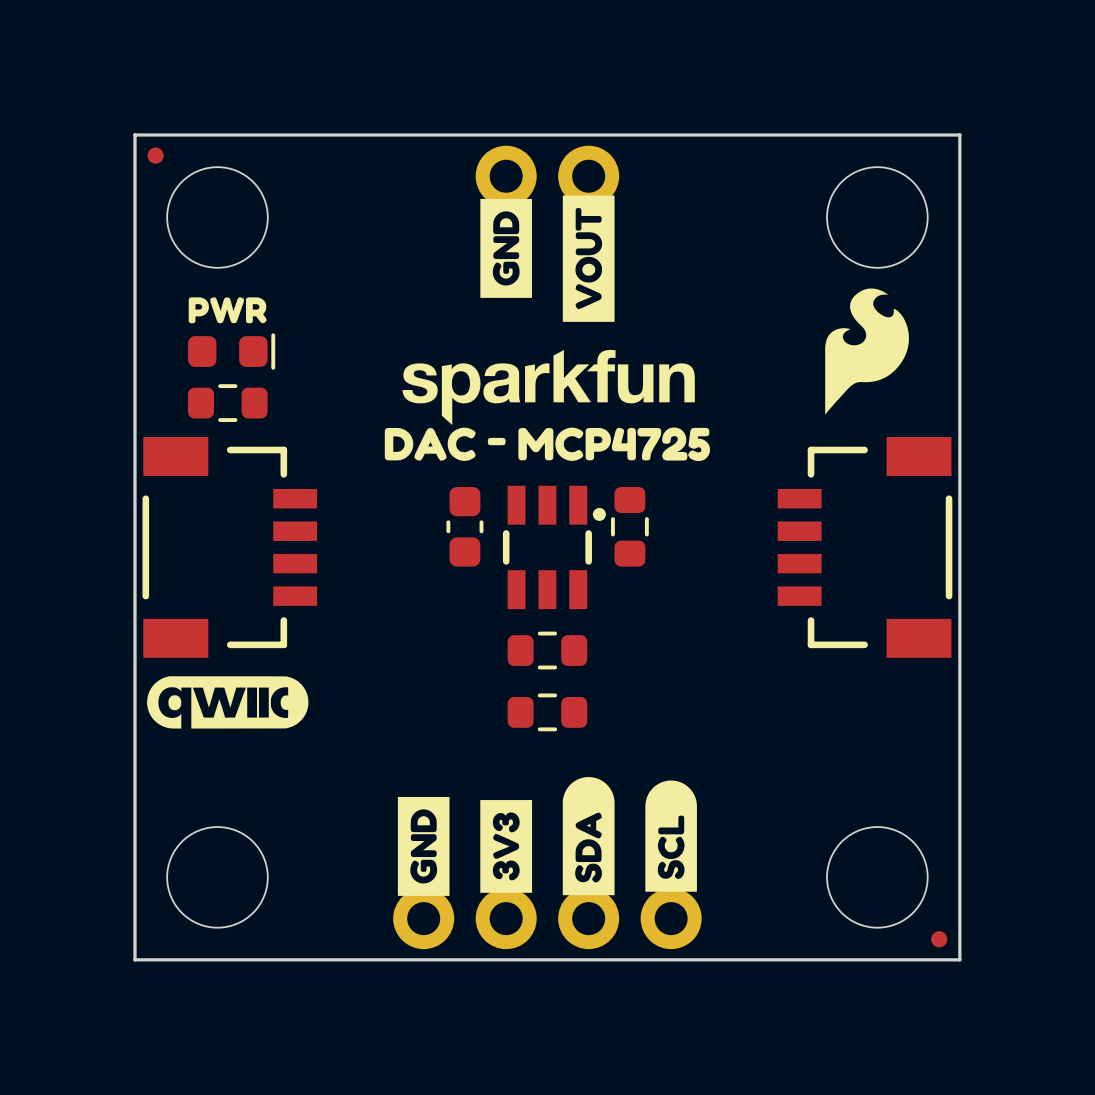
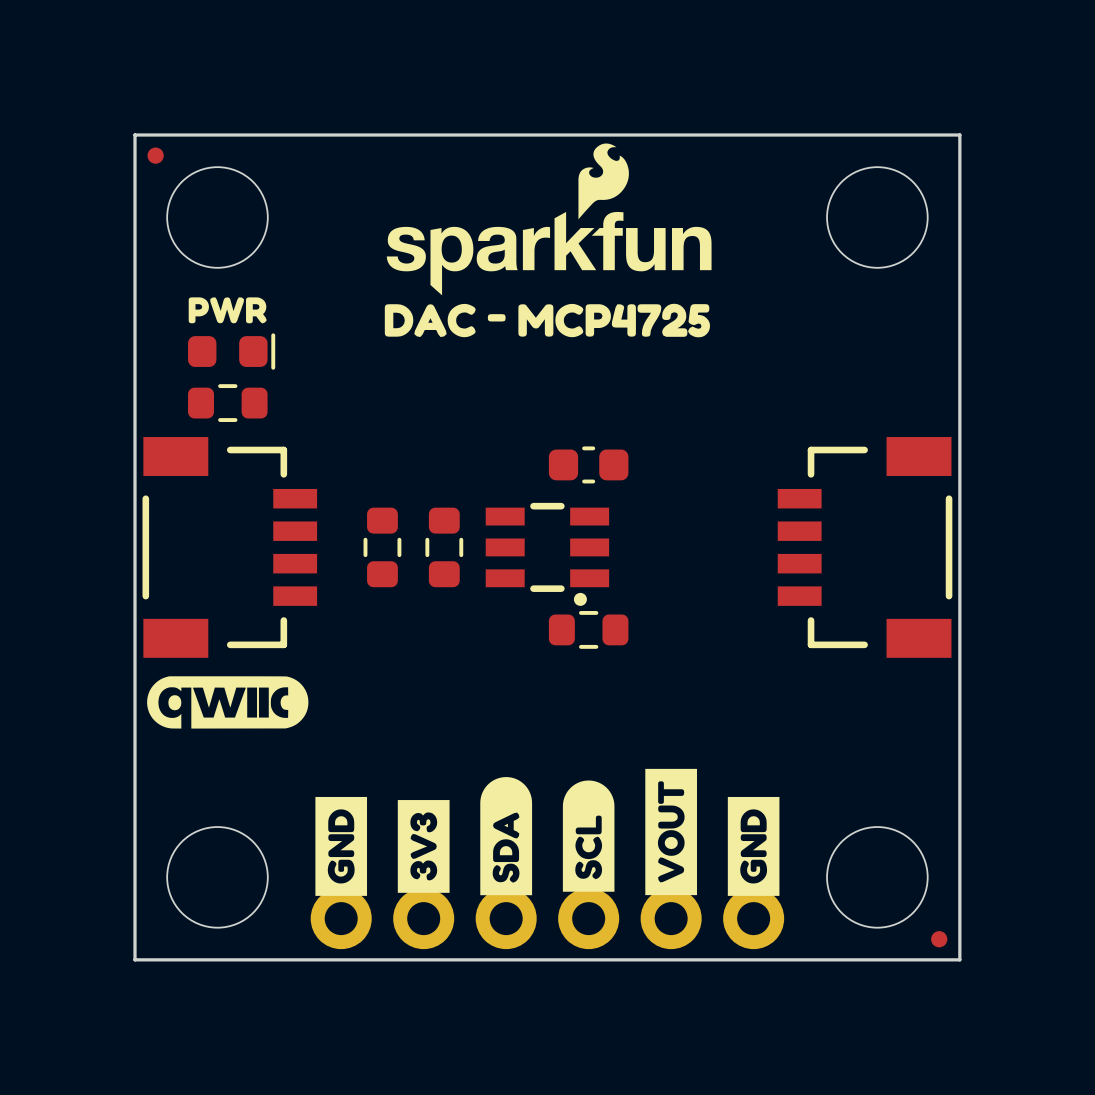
drawing: none -> [386, 143, 712, 296]
part position: (547, 176) -> (712, 918)
drawing: [480, 198, 532, 298] -> none
drawing position: (588, 258) -> (671, 831)
drawing: [825, 288, 909, 415] -> none
drawing: [402, 349, 695, 425] -> none
drawing position: (547, 444) -> (547, 320)
part: none -> (588, 464)
part footprint: [446, 487, 484, 567] -> [425, 507, 464, 588]
part: (629, 526) -> none
part: none -> (382, 547)
part rotation: 0° (554, 547) -> 90° clockwise (547, 554)
part: none -> (588, 629)
part: (547, 650) -> none
part: (547, 712) -> none
drawing: none -> [727, 796, 780, 896]
drawing position: (588, 836) -> (506, 836)
drawing position: (671, 836) -> (588, 836)
drawing position: (423, 846) -> (341, 846)
drawing position: (506, 846) -> (423, 846)
part position: (547, 918) -> (464, 918)

